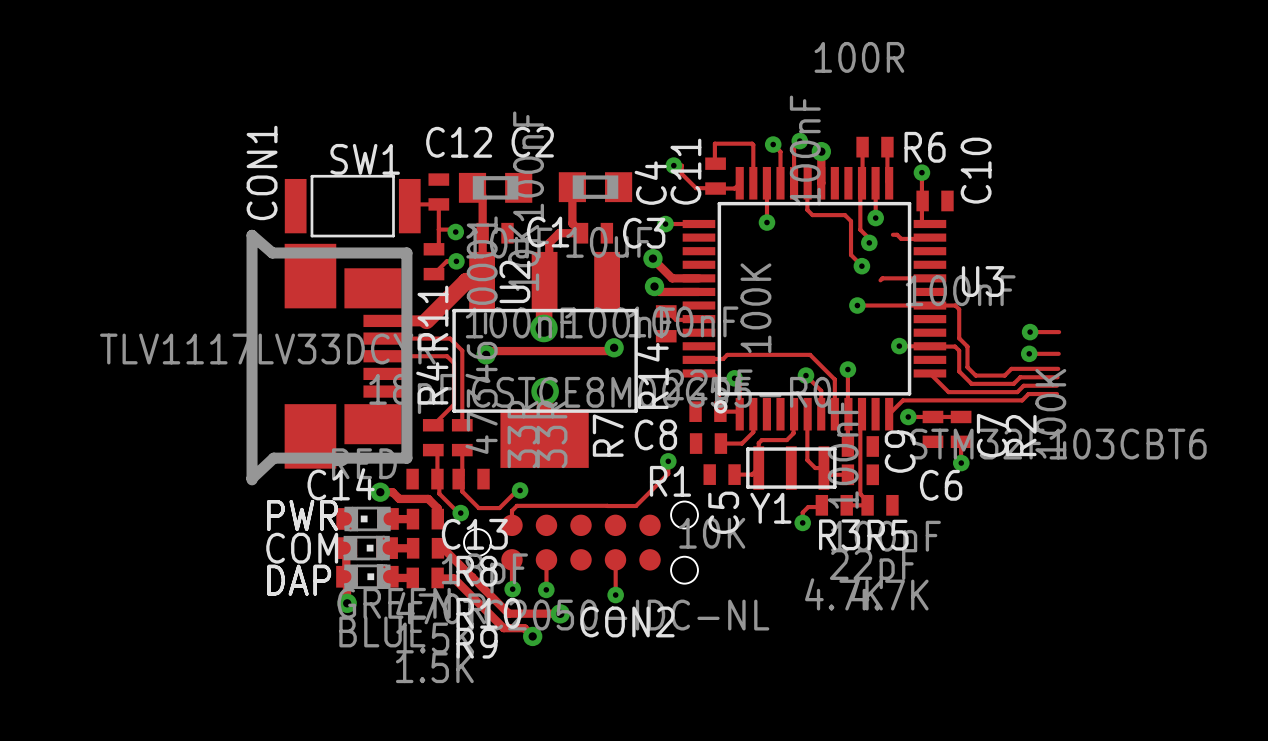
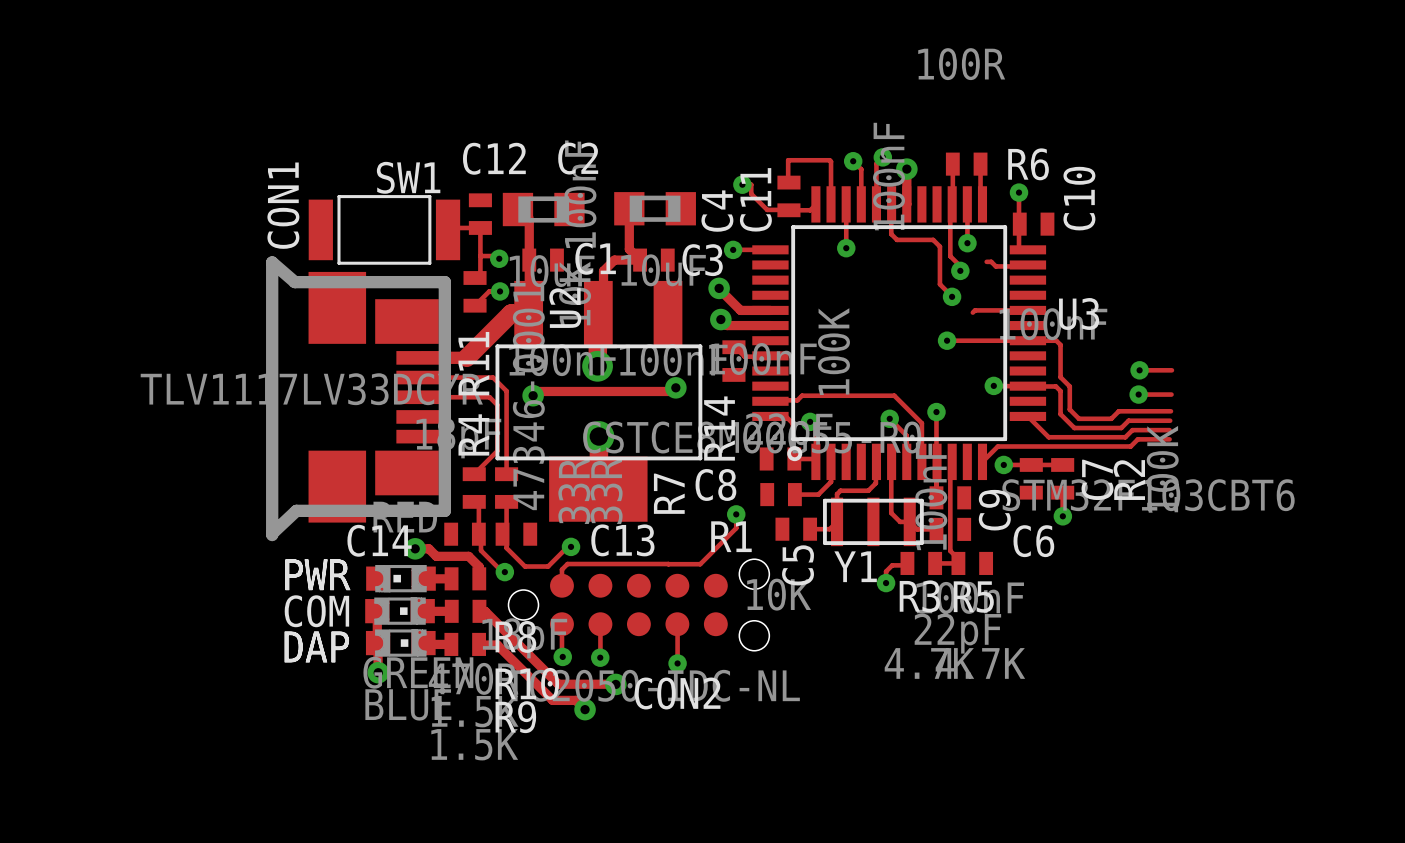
C13 name position: C13 (474, 534) -> C13 (622, 540)

